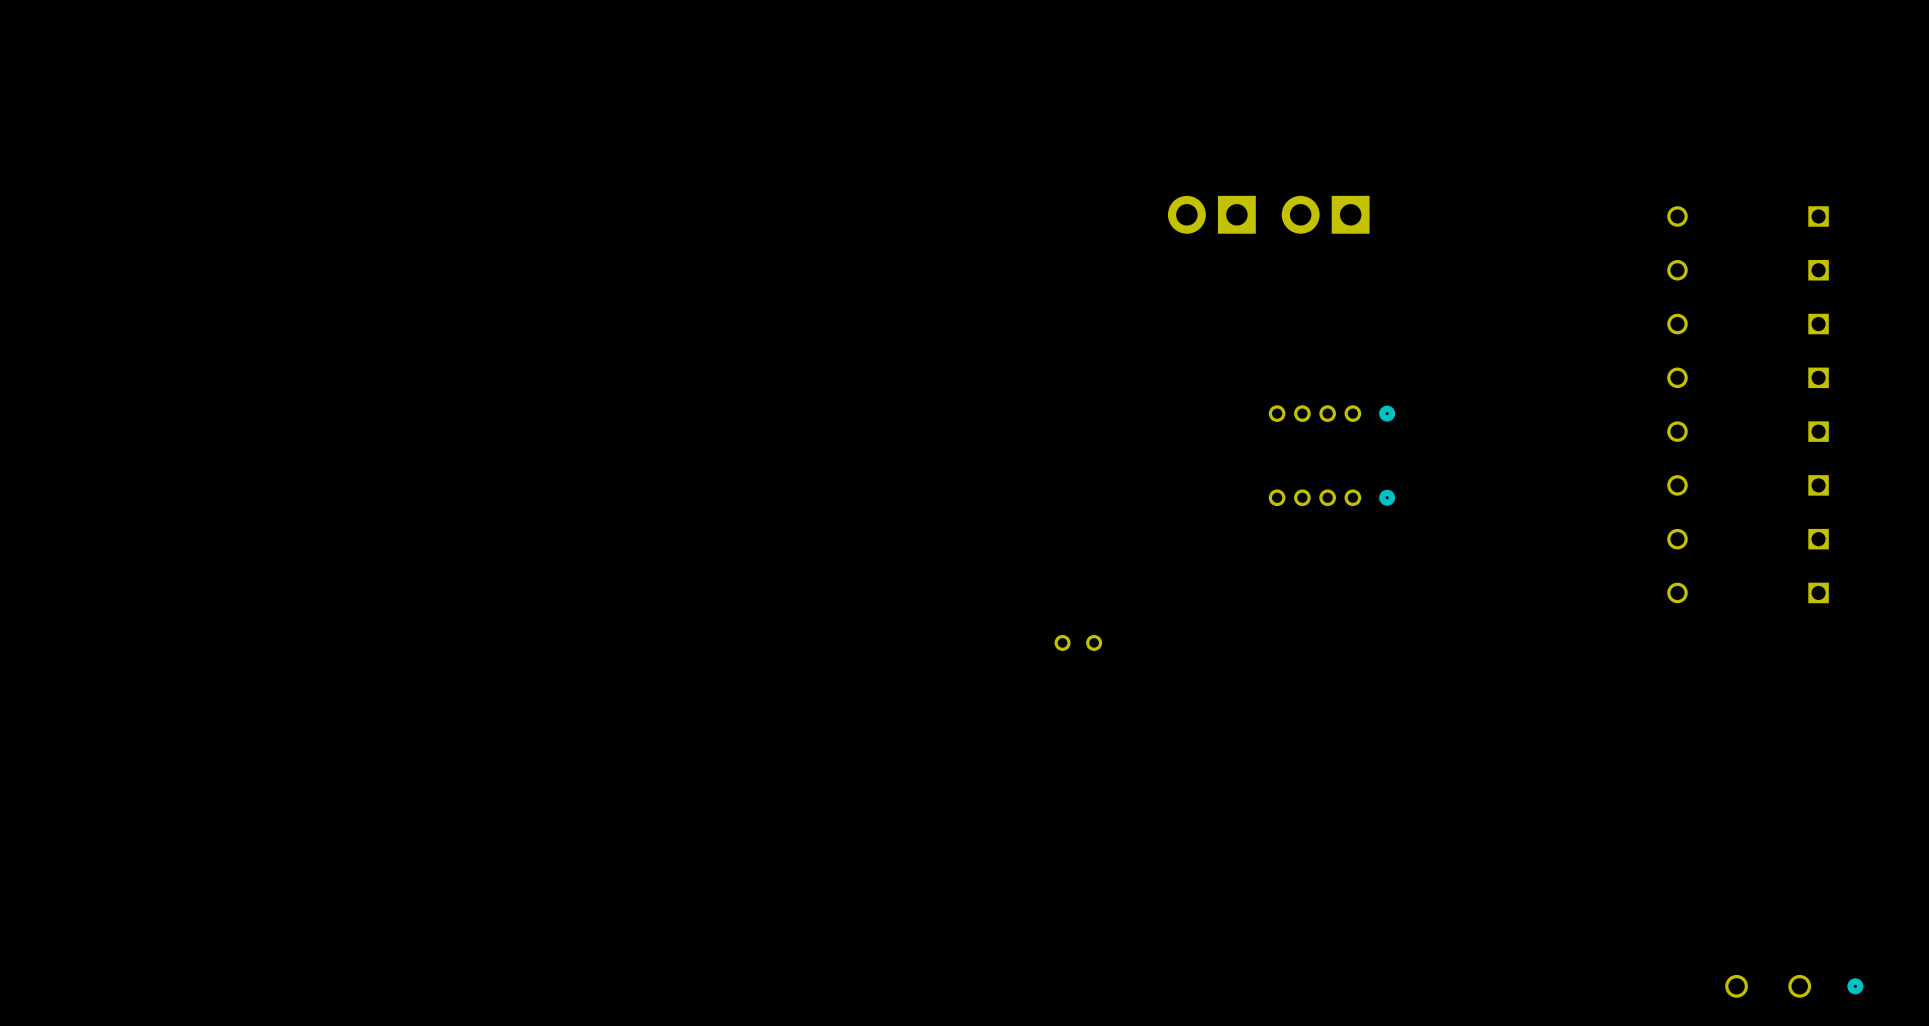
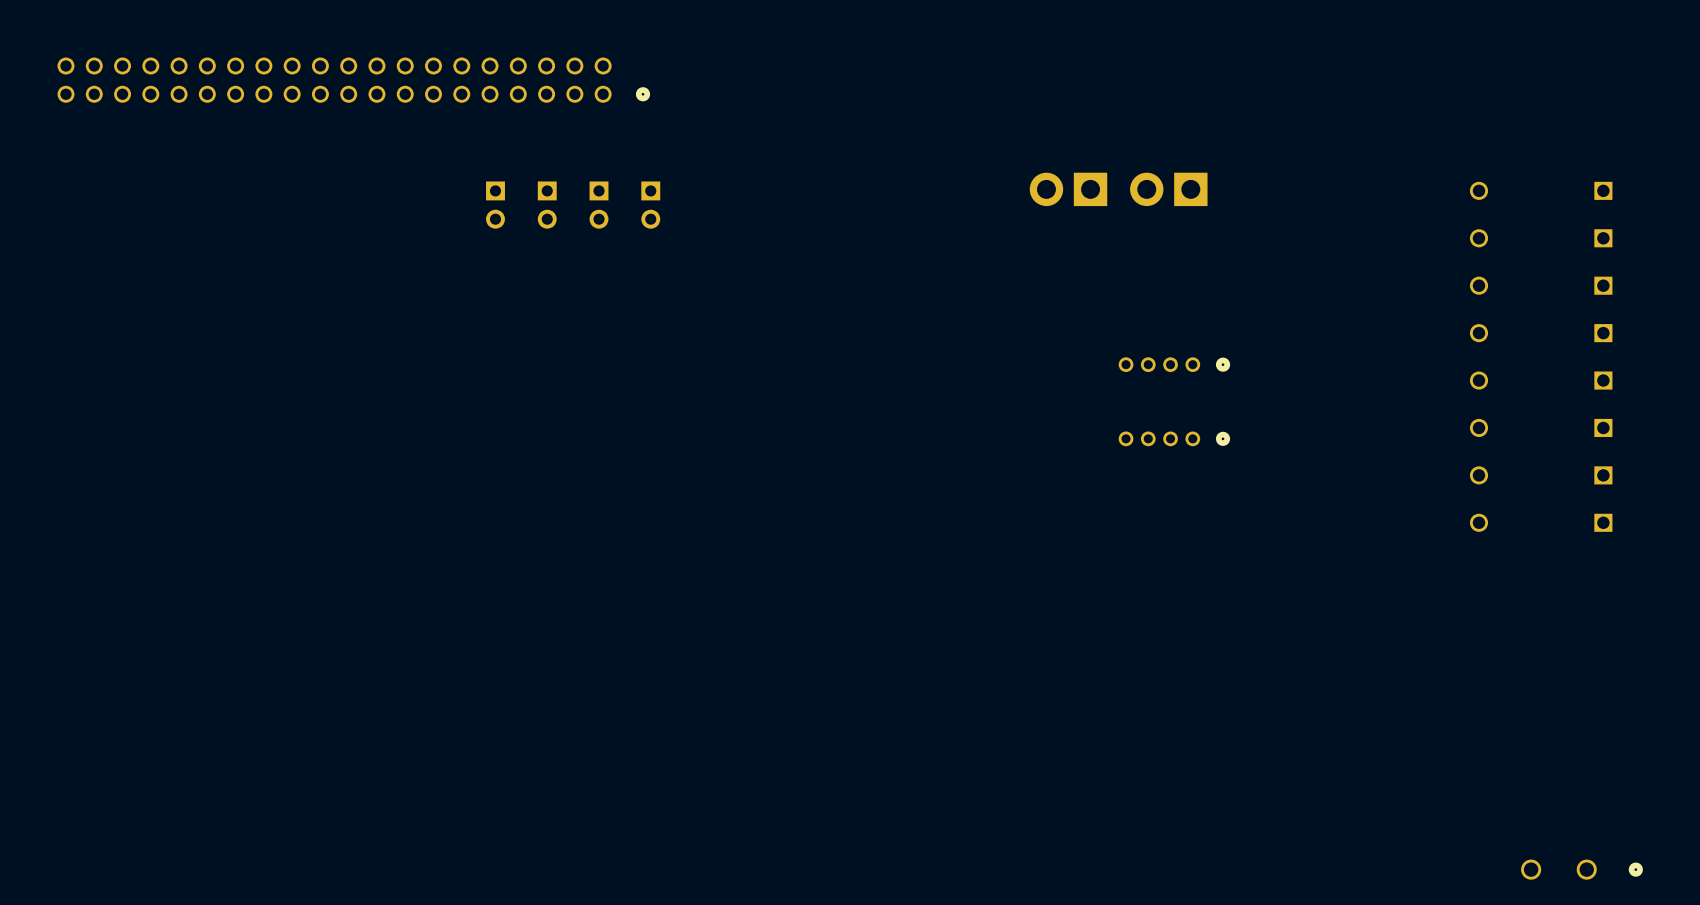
part: none -> (353, 80)
part: none -> (495, 205)
part: none -> (547, 205)
part: none -> (599, 205)
part: none -> (650, 205)
part: (1078, 642) -> none

